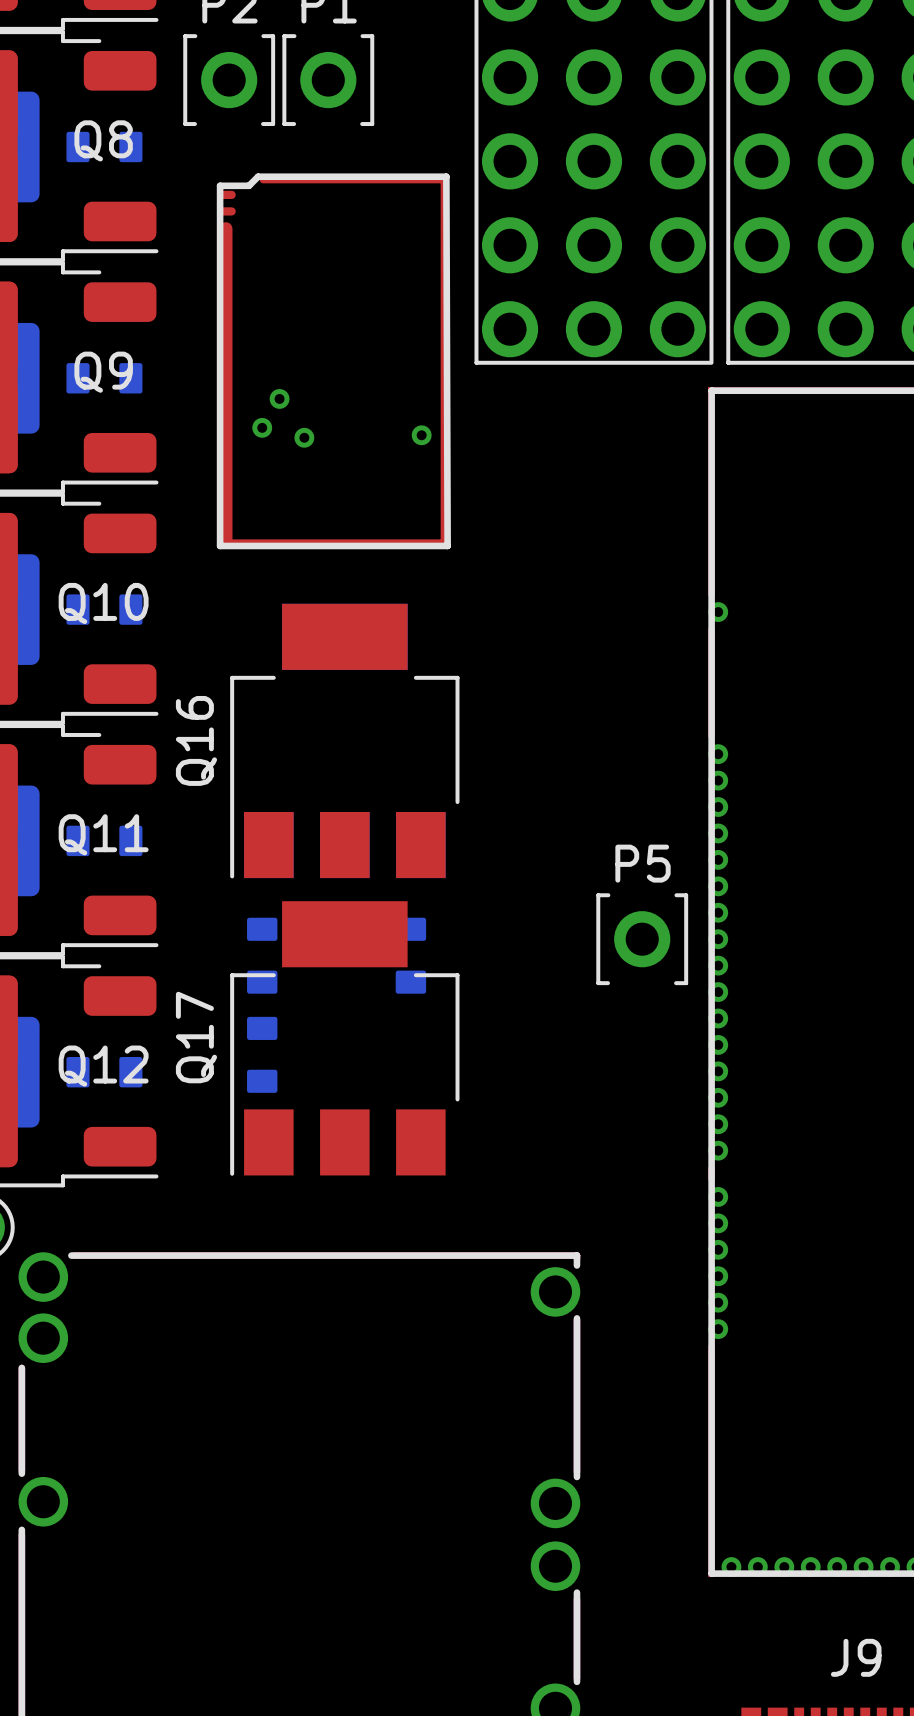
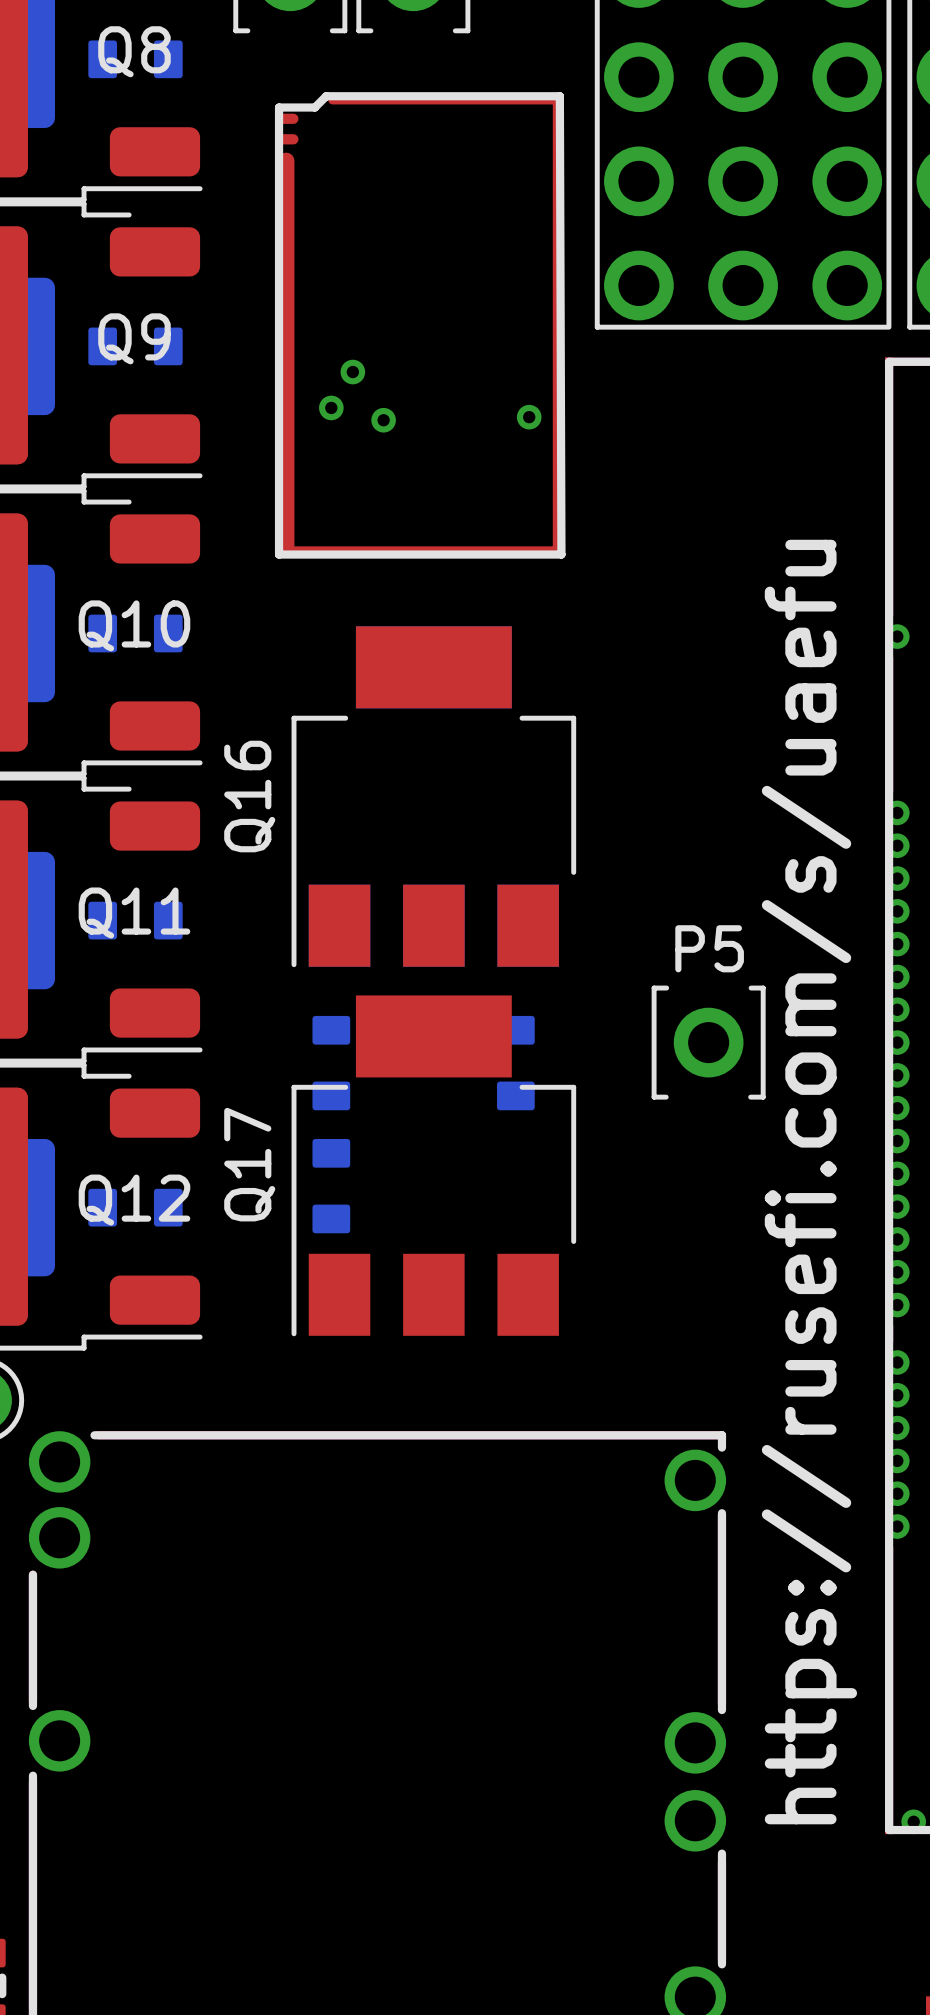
P5 position: (642, 939) -> (708, 1042)
text: none -> https://rusefi.com/s/uaefu (809, 1182)

